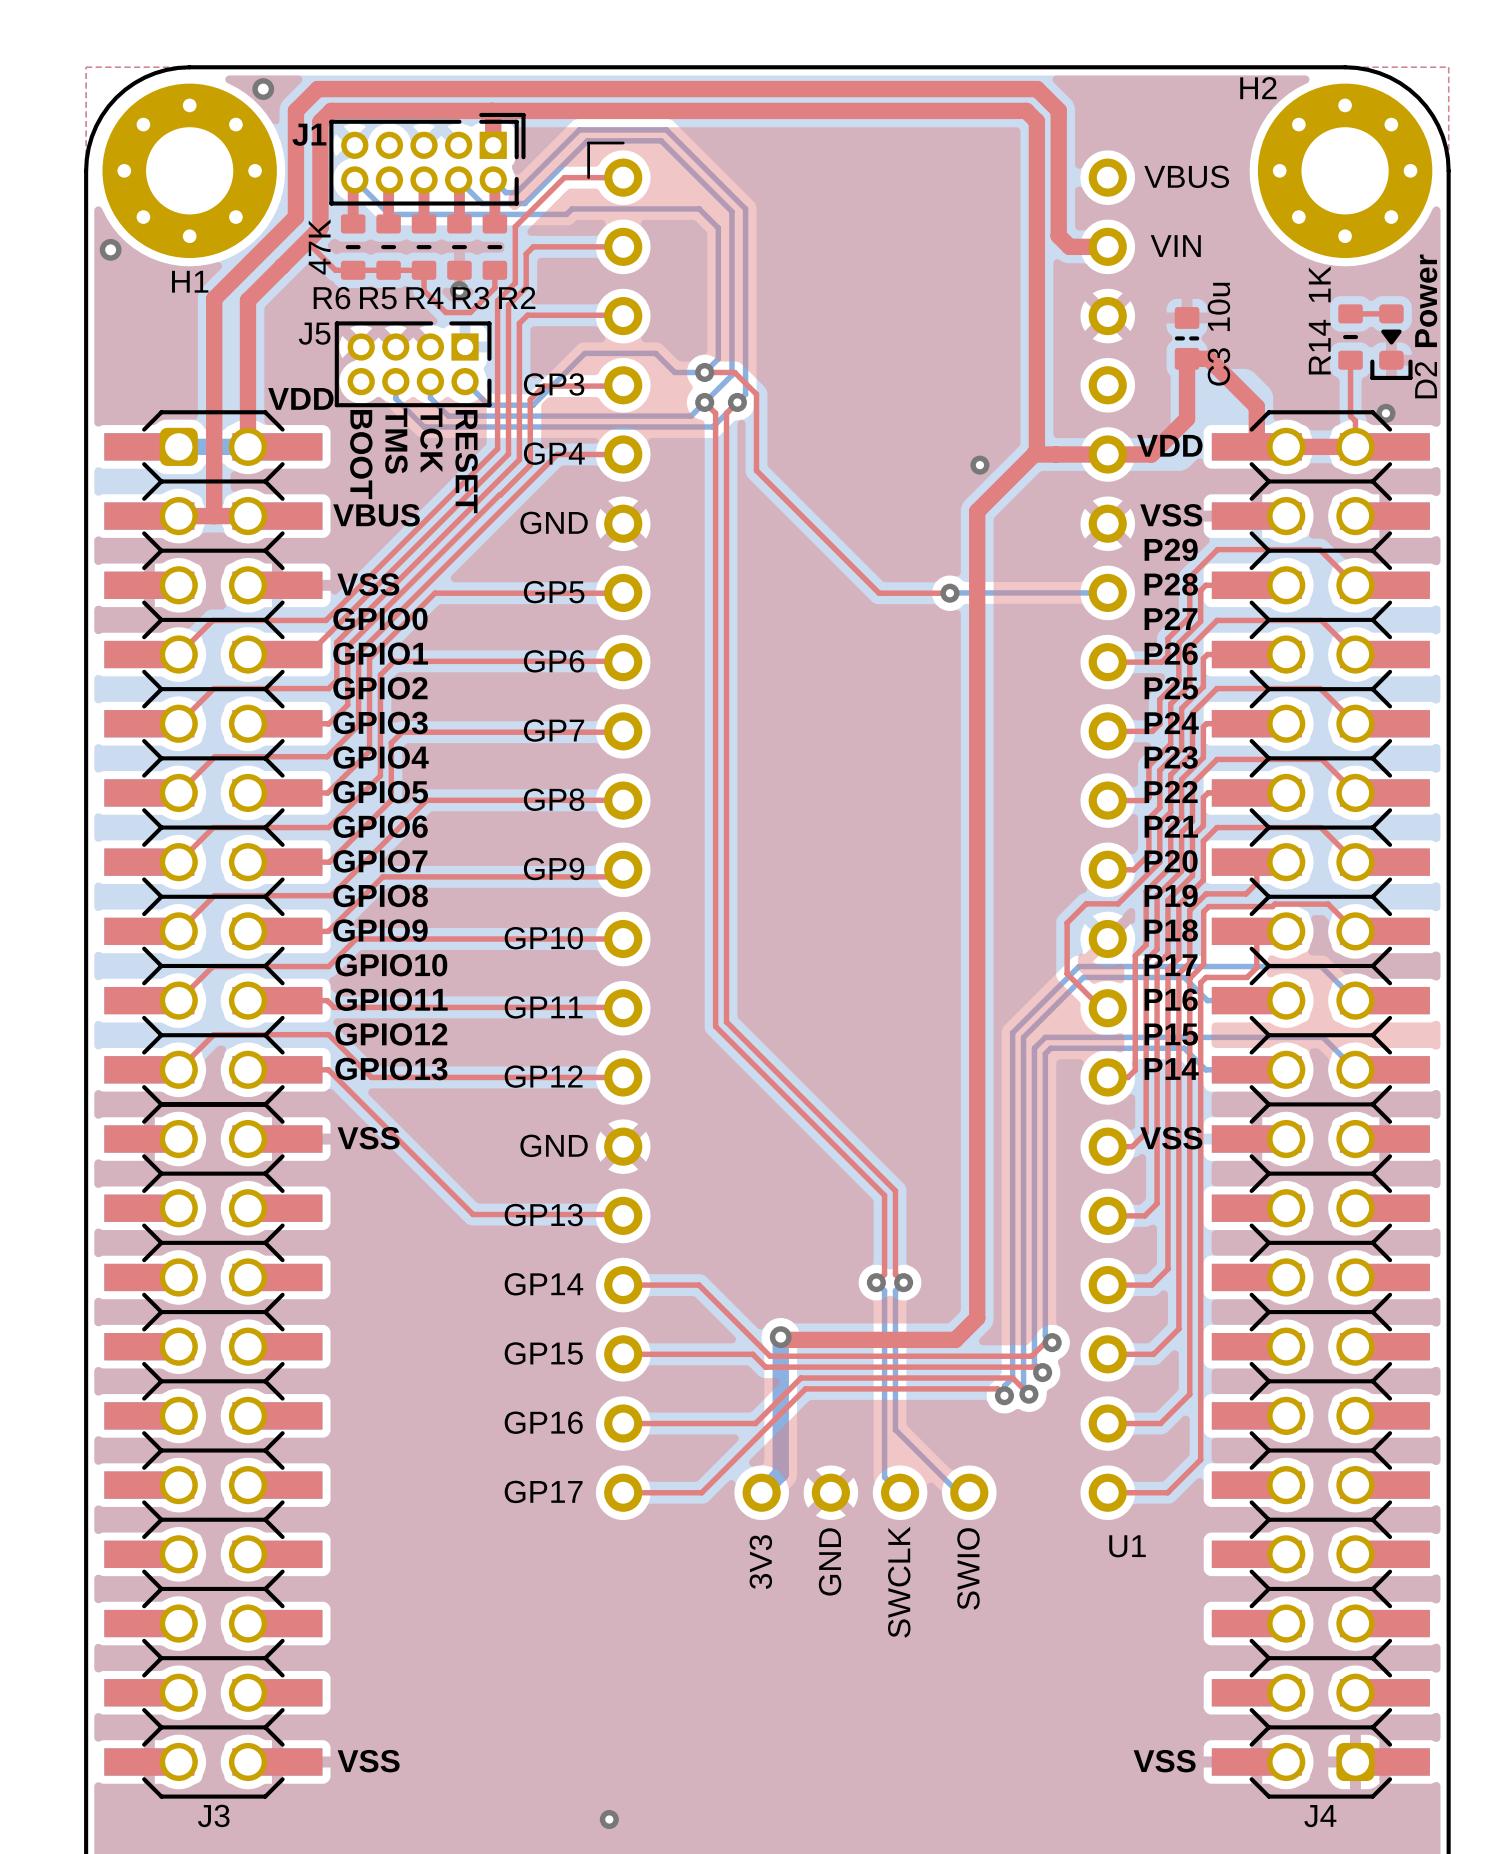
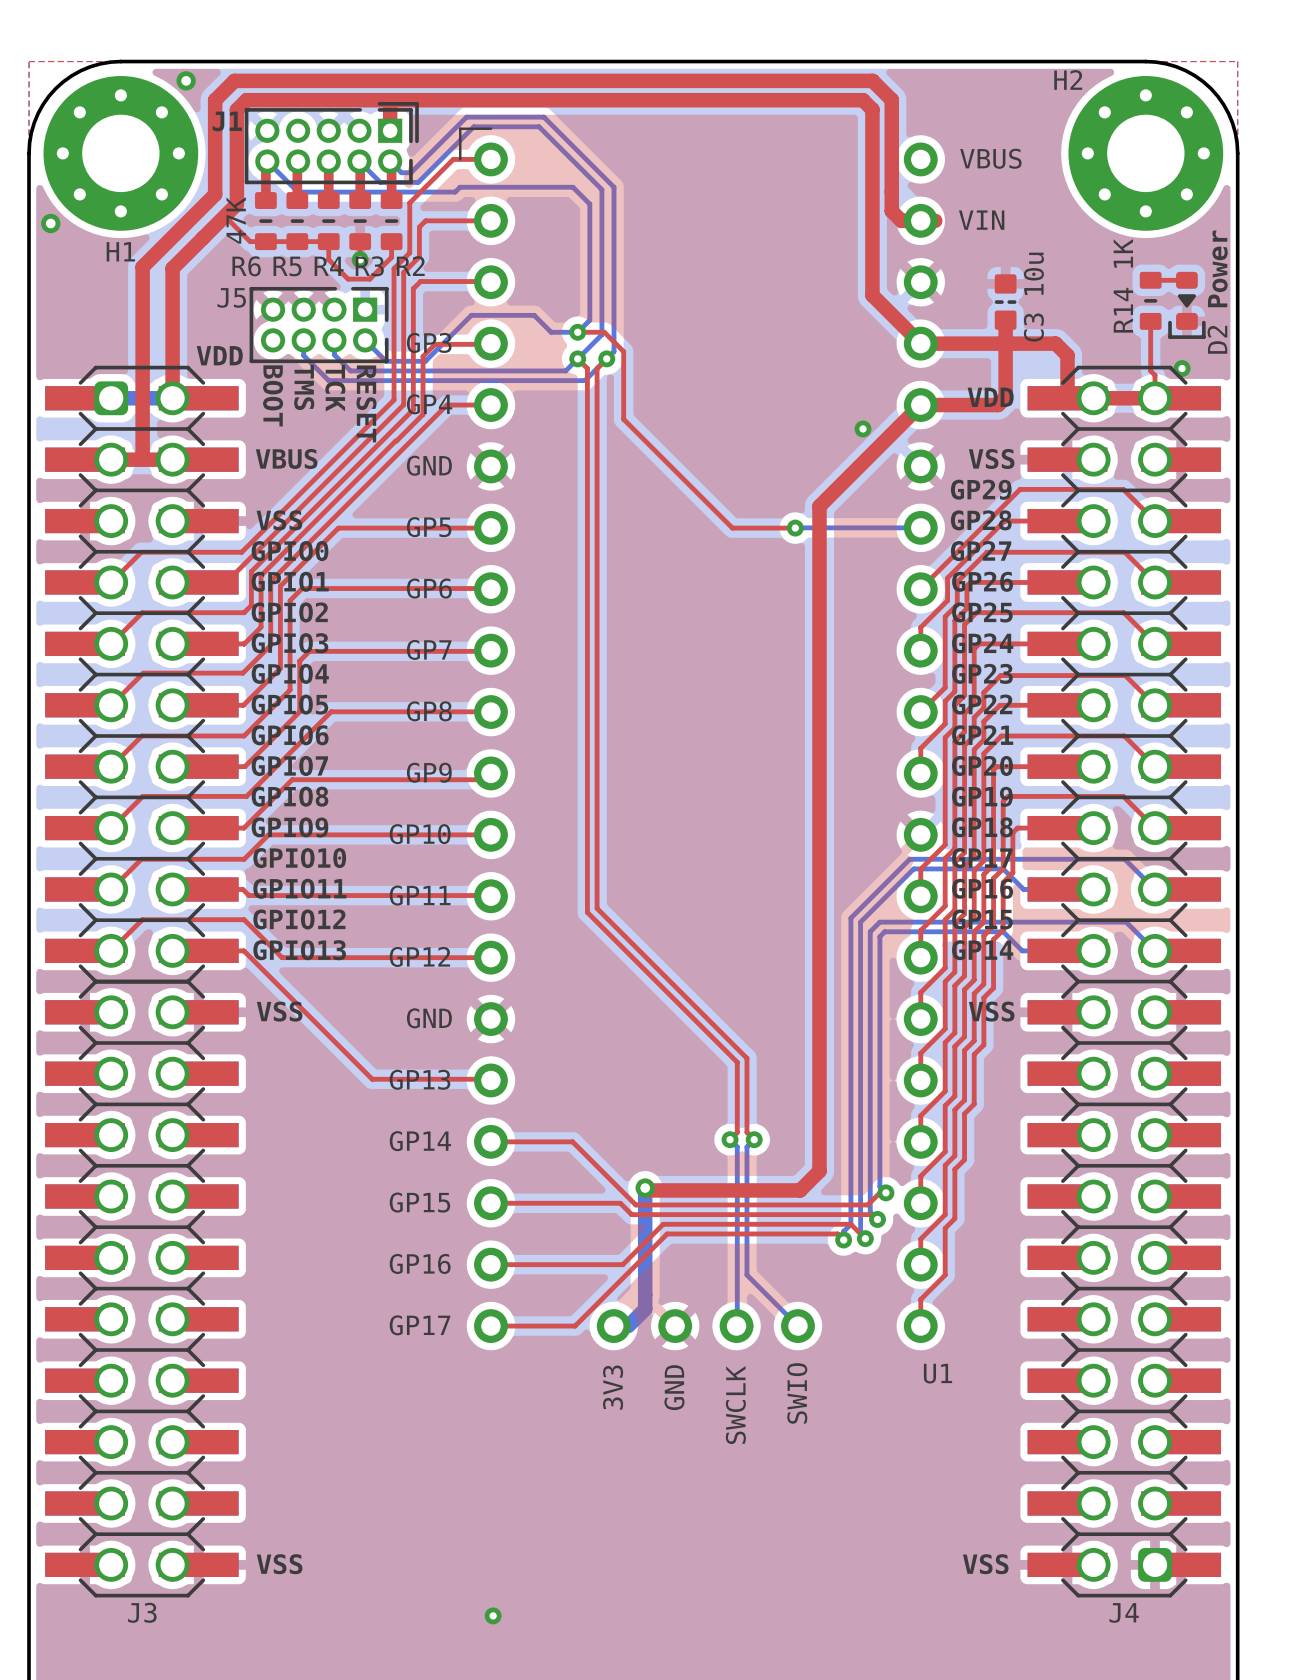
top track: (1036, 330) (1036, 451) (977, 511) (977, 568) -> none
top track: (1187, 358) (1208, 358) (1256, 406) -> (872, 295) (920, 343) (1055, 343) (1067, 355) (1067, 362)
J4 footprint: [1211, 410, 1430, 1799] -> [1027, 365, 1222, 1598]
top track: (1187, 418) (1151, 454) -> (1005, 373) (1005, 397) (998, 405) (973, 405)
top track: (1034, 454) (1091, 454) -> (819, 506) (920, 405)
via position: (979, 465) -> (863, 428)
top track: (1217, 549) (1189, 577) (1189, 616) (1167, 638) (1167, 655) (1161, 662) (1107, 662) -> (1032, 489) (1020, 489) (920, 588)
top track: (1205, 585) (1200, 590) (1200, 621) (1178, 643) (1178, 680) (1159, 699) (1159, 724) (1152, 731) (1107, 731) -> (1022, 521) (1004, 521) (947, 578) (947, 600) (920, 627) (920, 650)
top track: (1217, 620) (1189, 647) (1189, 685) (1170, 704) (1170, 744) (1148, 765) (1148, 797) (1145, 800) (1107, 800) -> (1032, 552) (987, 552) (957, 582) (957, 604) (945, 616) (945, 687) (920, 712)
top track: (1207, 654) (1203, 658) (1203, 686) (1181, 708) (1181, 748) (1159, 770) (1159, 807) (1148, 818) (1148, 854) (1133, 869) (1107, 869) -> (1023, 582) (970, 582) (966, 586) (966, 608) (954, 620) (954, 691) (945, 701) (945, 723) (920, 748) (920, 773)
top track: (1217, 688) (1192, 713) (1192, 753) (1170, 774) (1170, 812) (1159, 823) (1159, 862) (1118, 903) (1086, 903) (1067, 922) (1067, 973) (1101, 1008) (1107, 1008) -> (1032, 612) (976, 612) (964, 624) (964, 695) (954, 705) (954, 727) (945, 737) (945, 844) (920, 869) (920, 896)
top track: (1206, 723) (1203, 726) (1203, 757) (1181, 779) (1181, 816) (1170, 827) (1170, 866) (1146, 891) (1146, 944) (1135, 955) (1135, 1070) (1127, 1077) (1107, 1077) -> (1022, 643) (979, 643) (974, 648) (974, 703) (964, 713) (964, 731) (954, 741) (954, 848) (945, 858) (945, 906) (920, 930) (920, 957)
top track: (1217, 759) (1192, 783) (1192, 821) (1181, 832) (1181, 871) (1157, 895) (1157, 949) (1146, 960) (1146, 1132) (1132, 1146) (1107, 1146) -> (1032, 675) (1000, 675) (983, 692) (983, 707) (974, 717) (974, 735) (964, 745) (964, 852) (954, 862) (954, 910) (945, 919) (945, 968) (920, 992) (920, 1019)
top track: (1208, 792) (1203, 797) (1203, 825) (1192, 836) (1192, 875) (1167, 900) (1167, 953) (1157, 964) (1157, 1203) (1144, 1215) (1107, 1215) -> (1024, 705) (1000, 705) (983, 721) (983, 739) (974, 749) (974, 856) (964, 866) (964, 914) (954, 923) (954, 972) (945, 981) (945, 1028) (920, 1053) (920, 1080)
U1 position: (857, 826) -> (698, 735)
top track: (1217, 827) (1203, 841) (1203, 880) (1178, 904) (1178, 958) (1167, 969) (1167, 1269) (1151, 1285) (1107, 1285) -> (1032, 735) (1001, 735) (983, 753) (983, 860) (974, 870) (974, 918) (964, 927) (964, 976) (954, 985) (954, 1032) (945, 1042) (945, 1091) (920, 1115) (920, 1141)
top track: (1256, 862) (1256, 883) (1246, 893) (1206, 893) (1189, 910) (1189, 962) (1178, 973) (1178, 1328) (1153, 1354) (1107, 1354) -> (1067, 766) (996, 766) (993, 769) (993, 864) (983, 874) (983, 922) (974, 931) (974, 980) (964, 989) (964, 1036) (954, 1046) (954, 1096) (945, 1105) (945, 1151) (920, 1176) (920, 1203)
top track: (1328, 904) (1208, 906) (1203, 911) (1203, 964) (1189, 978) (1189, 1394) (1160, 1423) (1107, 1423) -> (1130, 803) (1123, 796) (1008, 796) (1003, 801) (1003, 868) (993, 878) (993, 926) (983, 935) (983, 984) (974, 993) (974, 1040) (964, 1050) (964, 1100) (954, 1109) (954, 1155) (945, 1165) (945, 1214) (920, 1239) (920, 1264)
top track: (1256, 931) (1256, 967) (1246, 977) (1206, 977) (1200, 982) (1200, 1459) (1167, 1492) (1107, 1492) -> (1067, 828) (1017, 828) (1012, 832) (1012, 872) (1003, 882) (1003, 930) (993, 939) (993, 988) (983, 997) (983, 1044) (974, 1054) (974, 1104) (964, 1113) (964, 1159) (954, 1169) (954, 1218) (945, 1228) (945, 1275) (920, 1299) (920, 1326)
bottom track: (895, 1429) (958, 1492) (969, 1492) -> (746, 1270) (746, 1275) (797, 1326)

